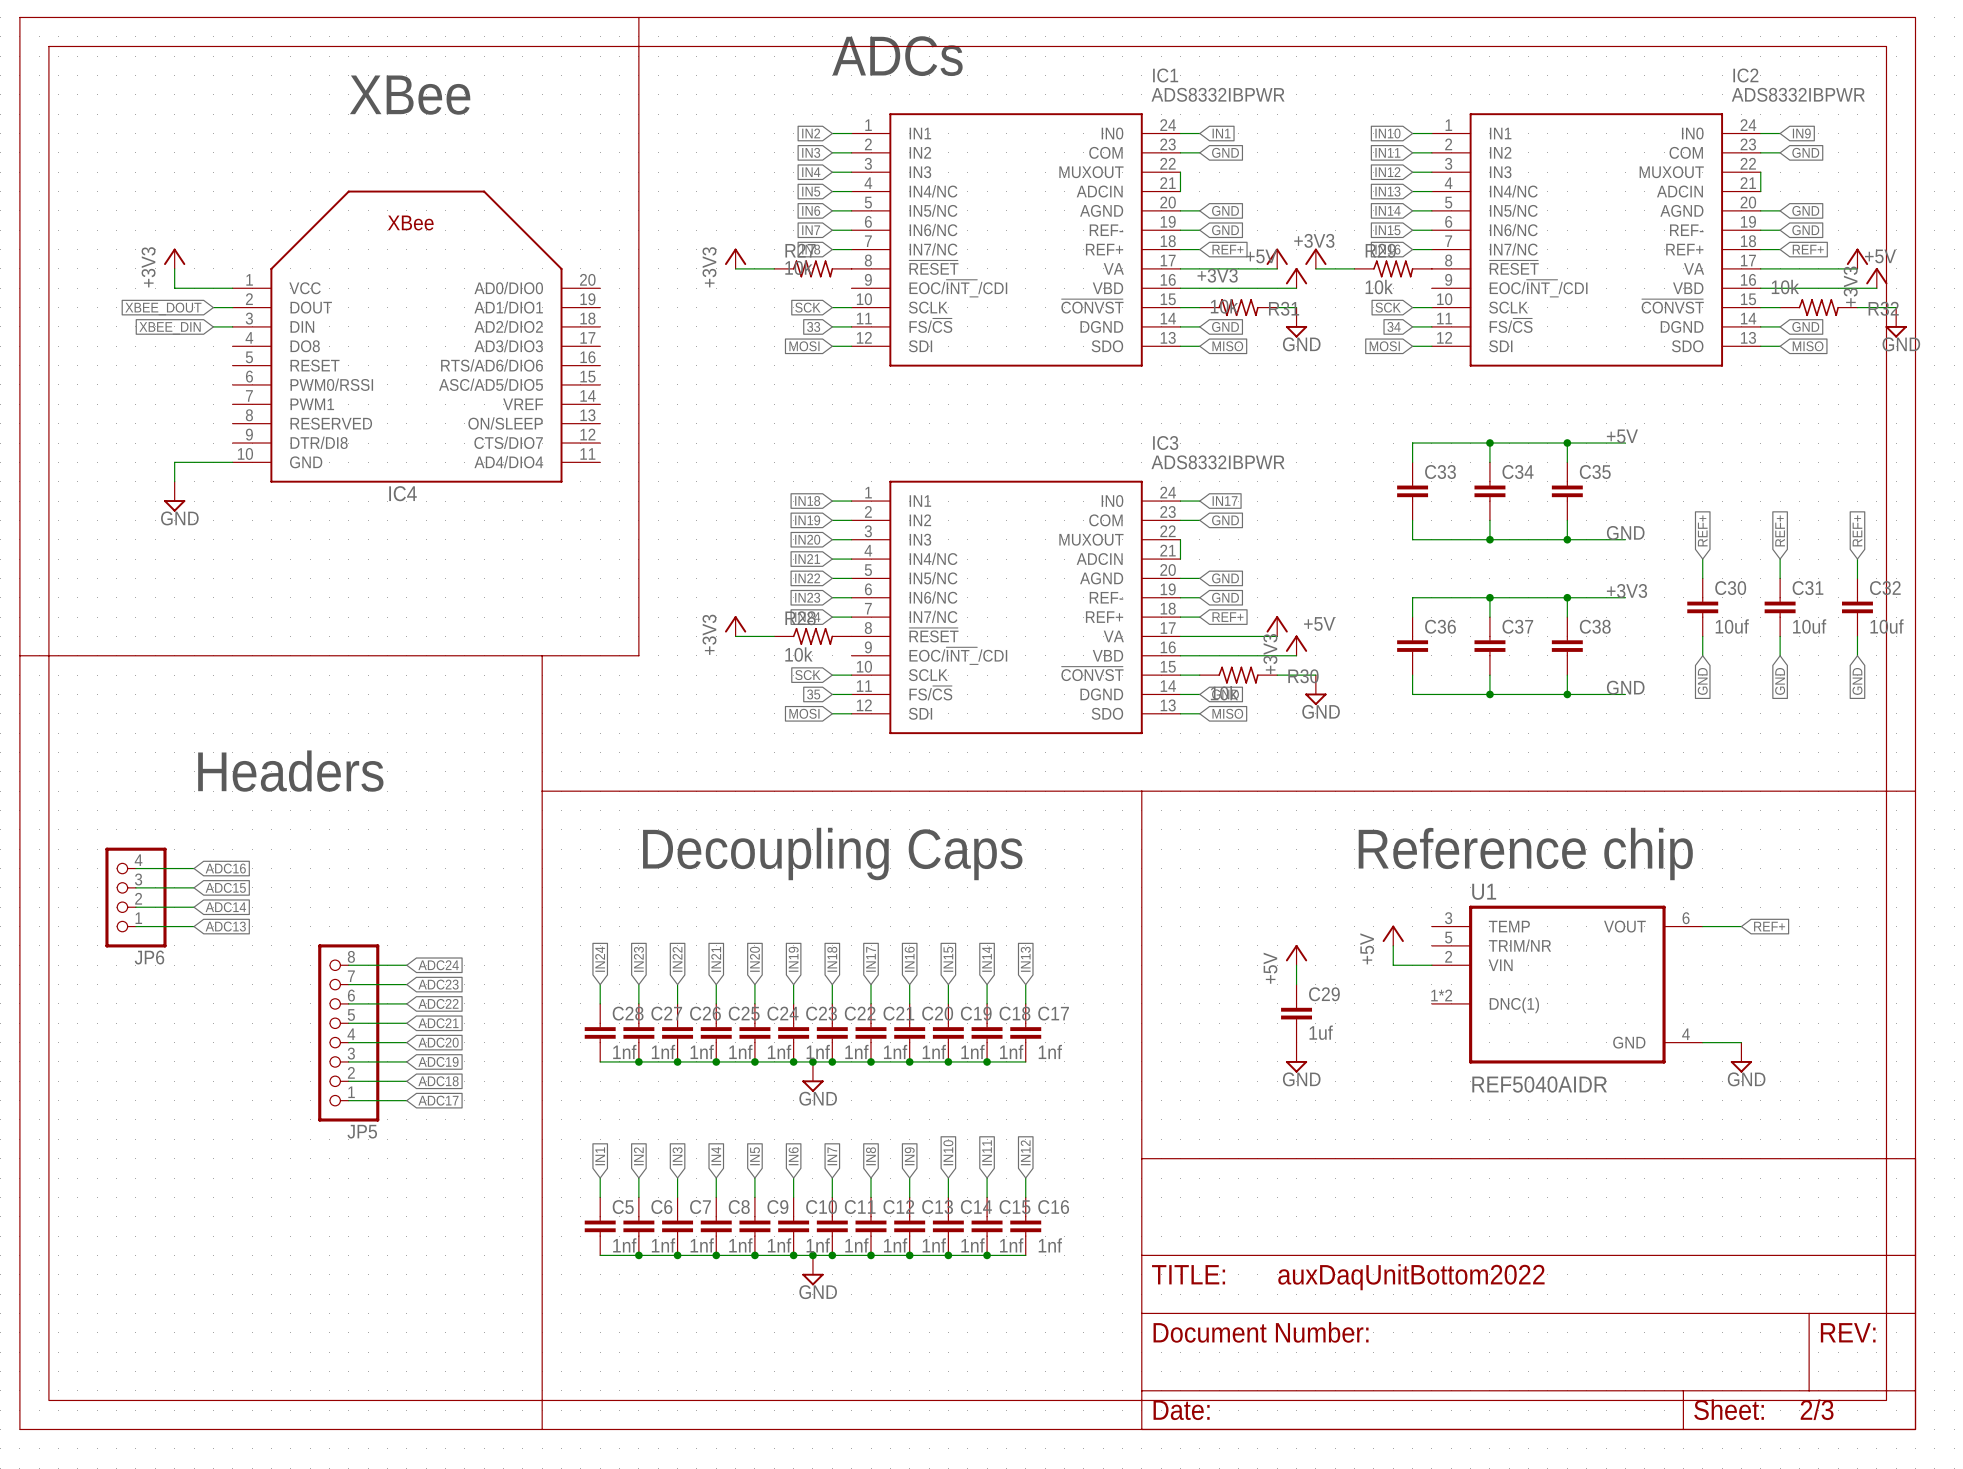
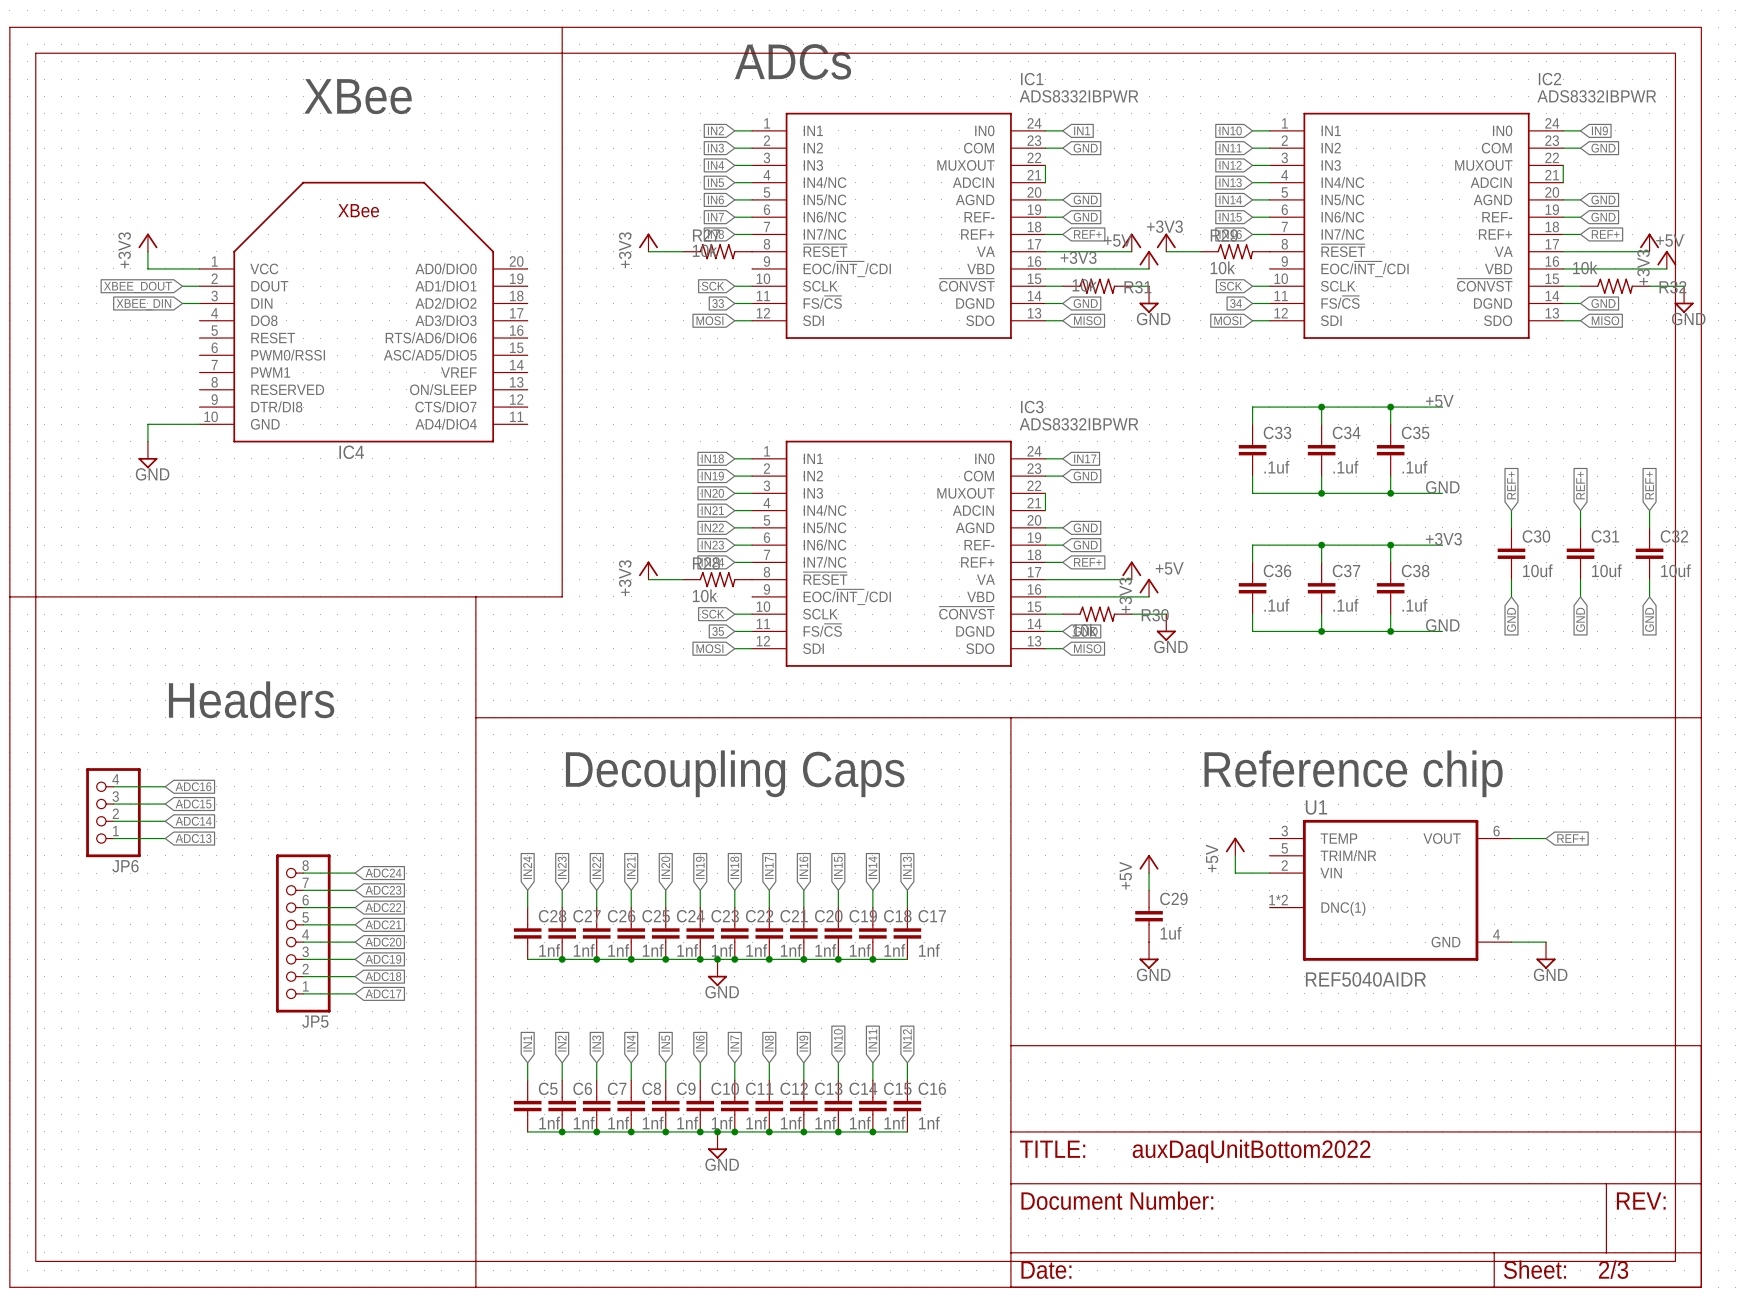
C33 value: none -> .1uf (1276, 467)
C34 value: none -> .1uf (1345, 467)
C35 value: none -> .1uf (1414, 467)
C36 value: none -> .1uf (1276, 605)
C37 value: none -> .1uf (1345, 605)
C38 value: none -> .1uf (1414, 605)

